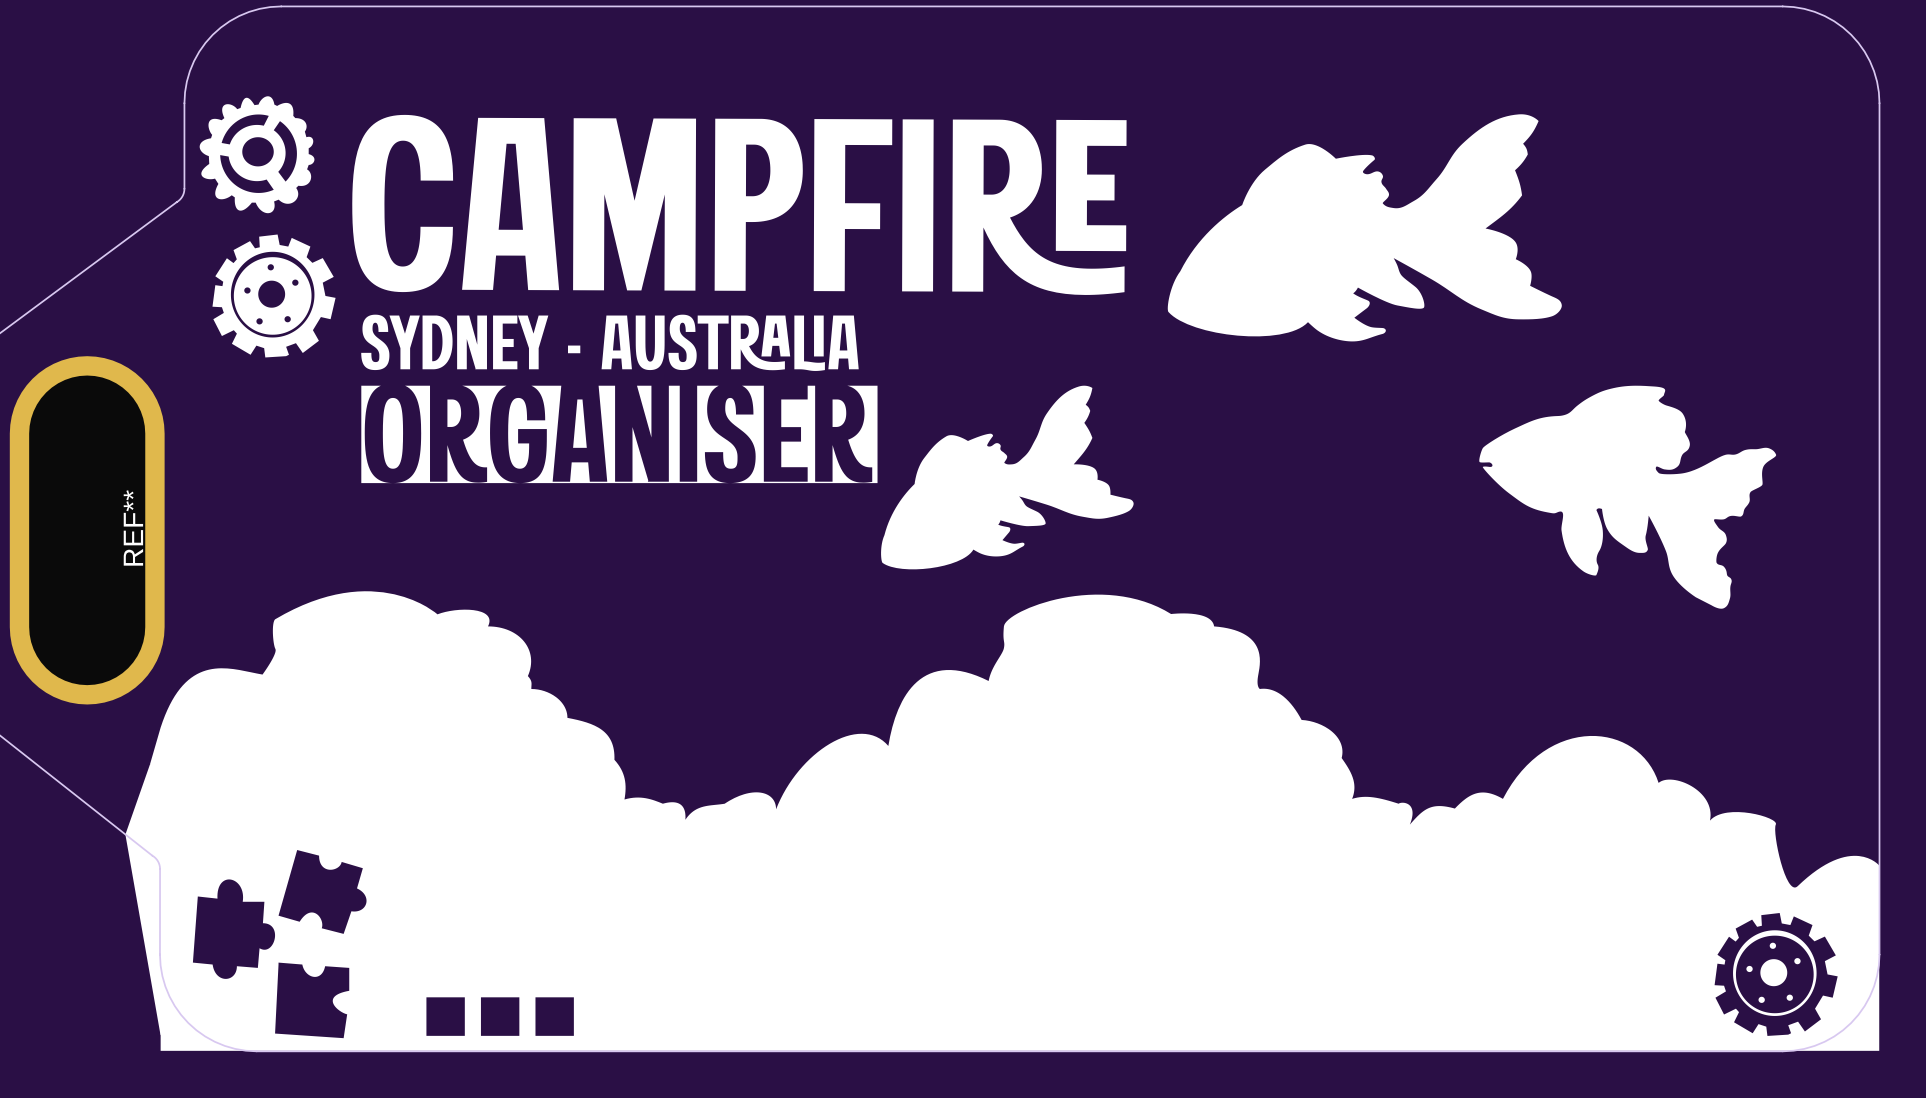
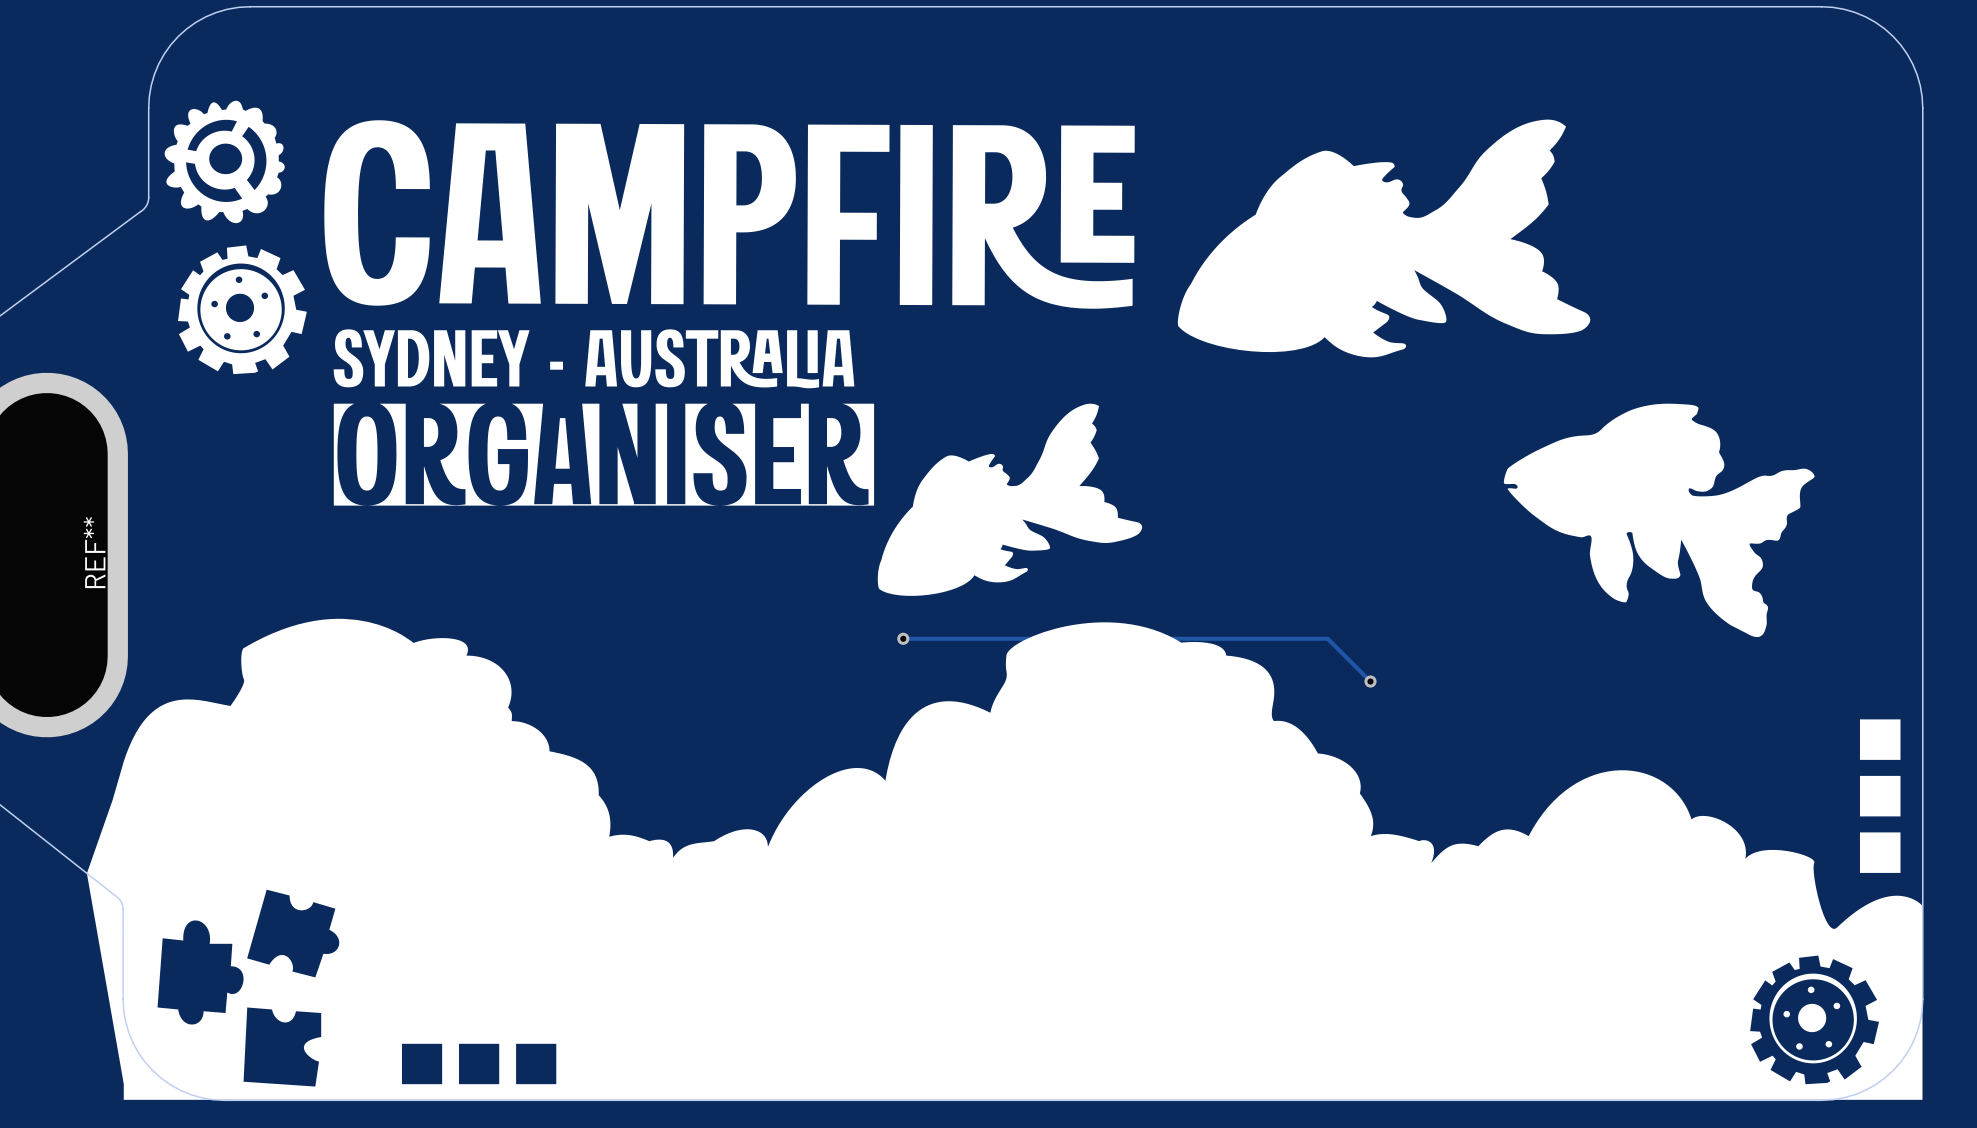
track: none -> (903, 638) (1327, 638) (1370, 681)
via: none -> (903, 638)
via: none -> (1370, 681)
drawing: none -> [1859, 719, 1901, 873]

